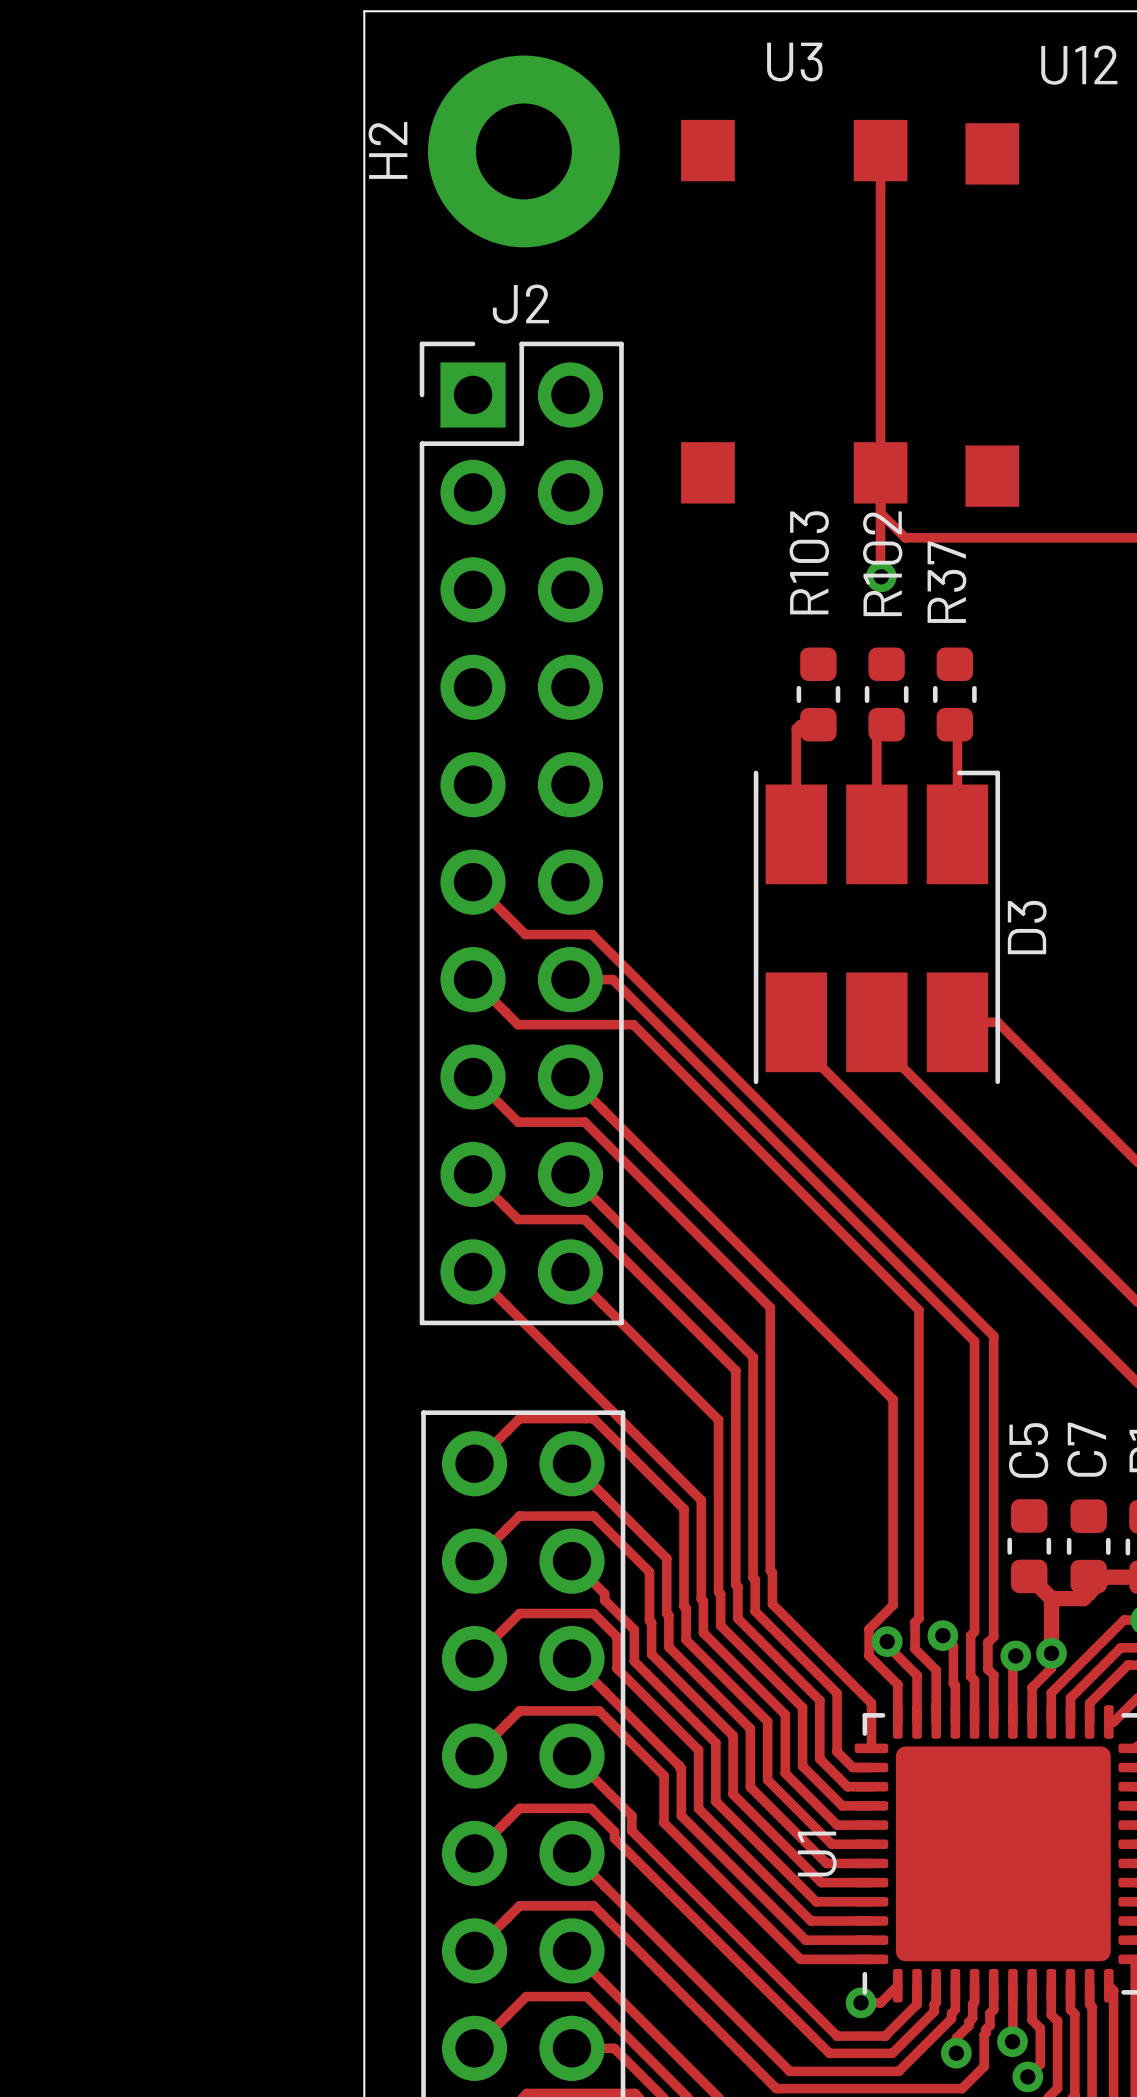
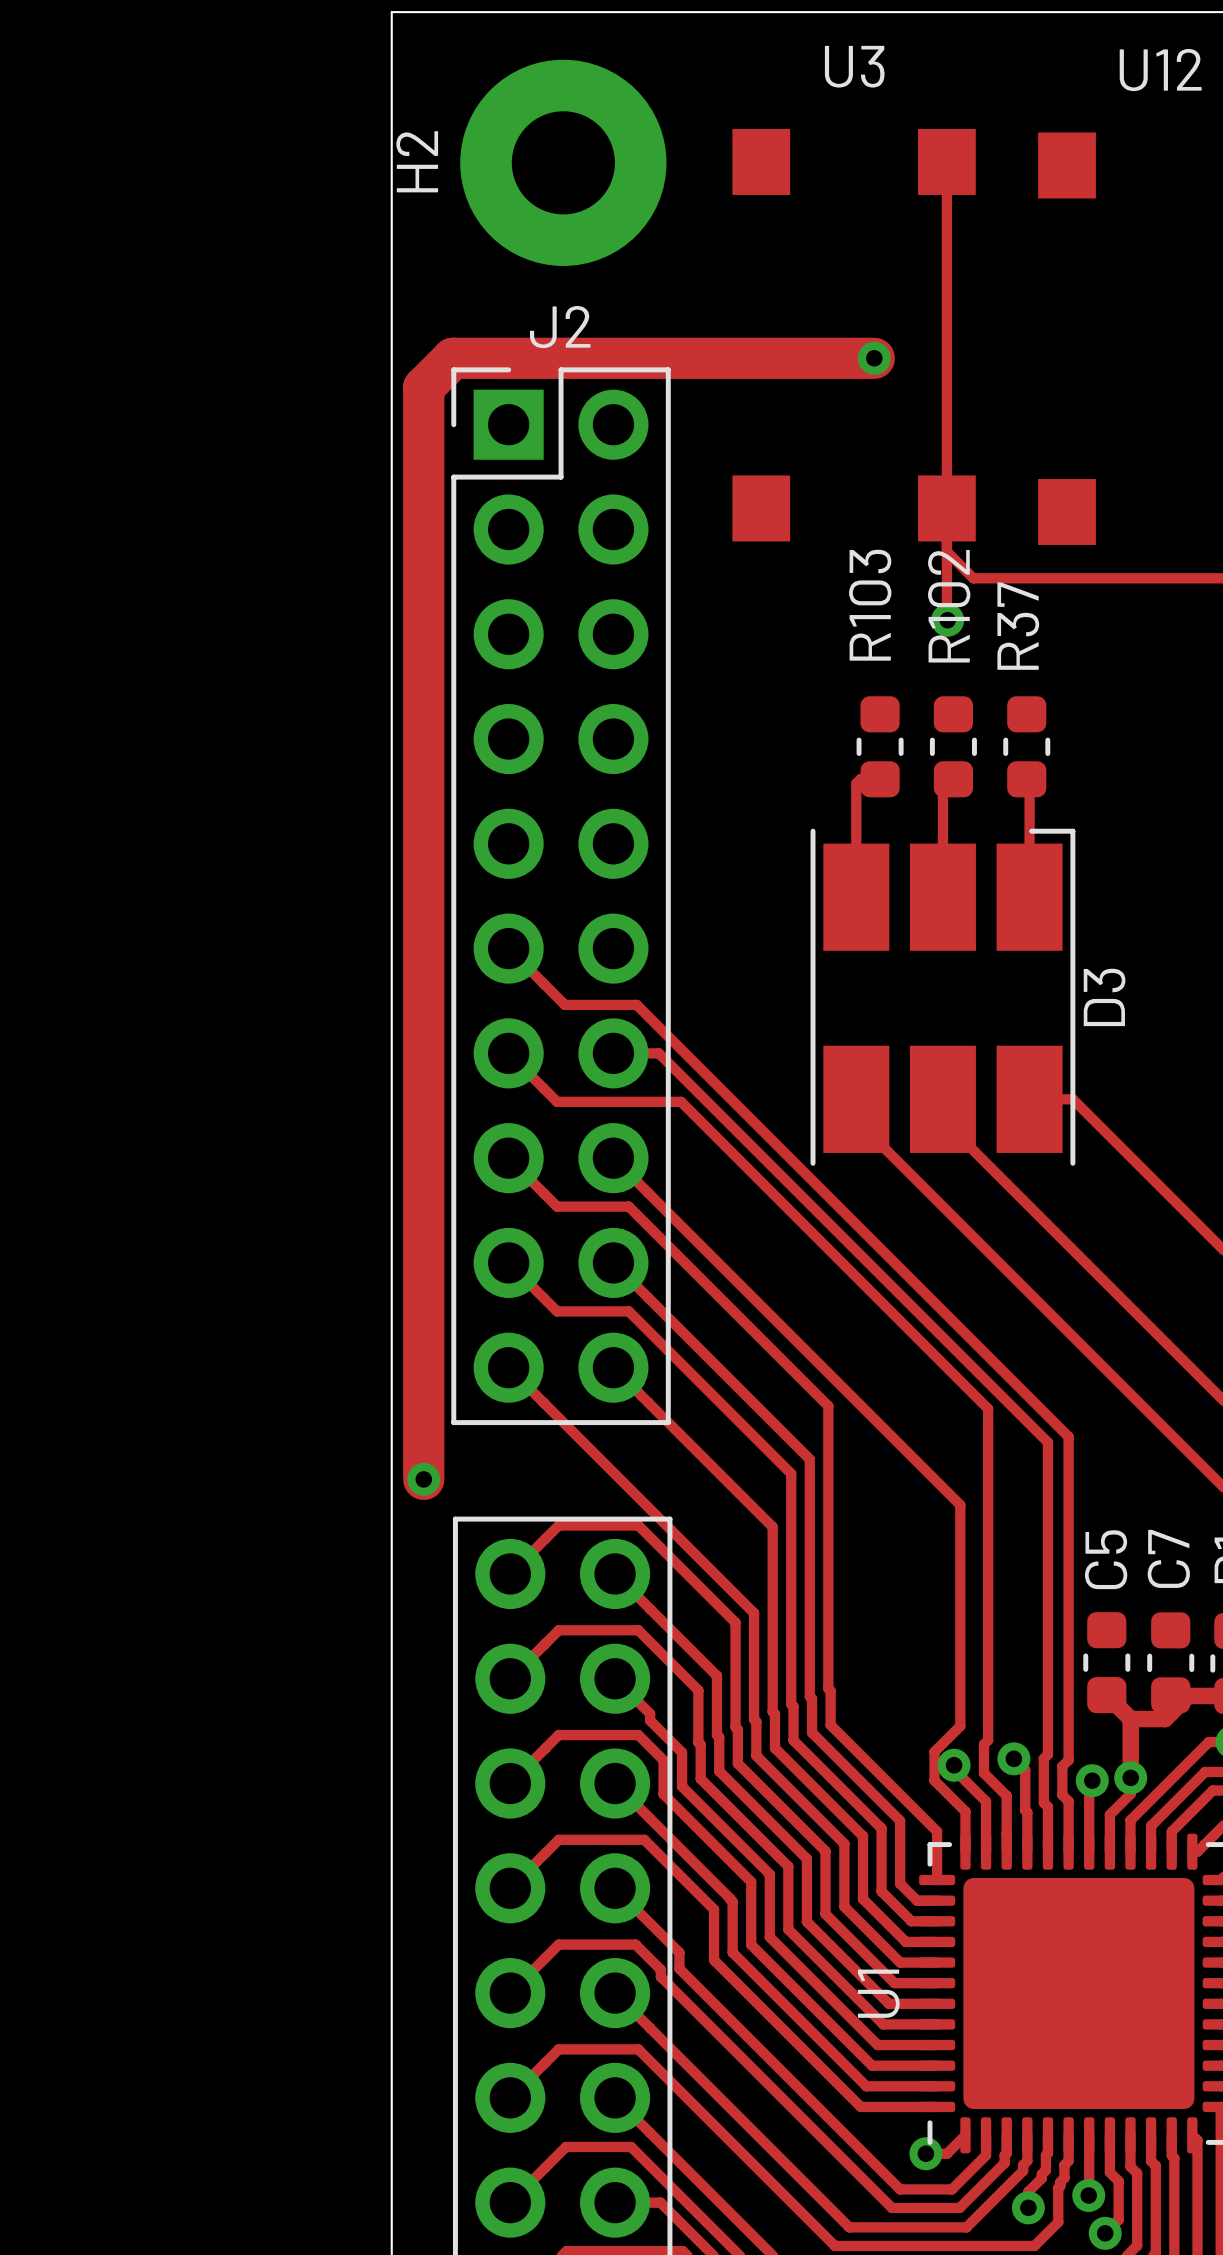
track: none -> (874, 358) (452, 358) (423, 387) (423, 1479)
via: none -> (874, 358)
via: none -> (423, 1479)

